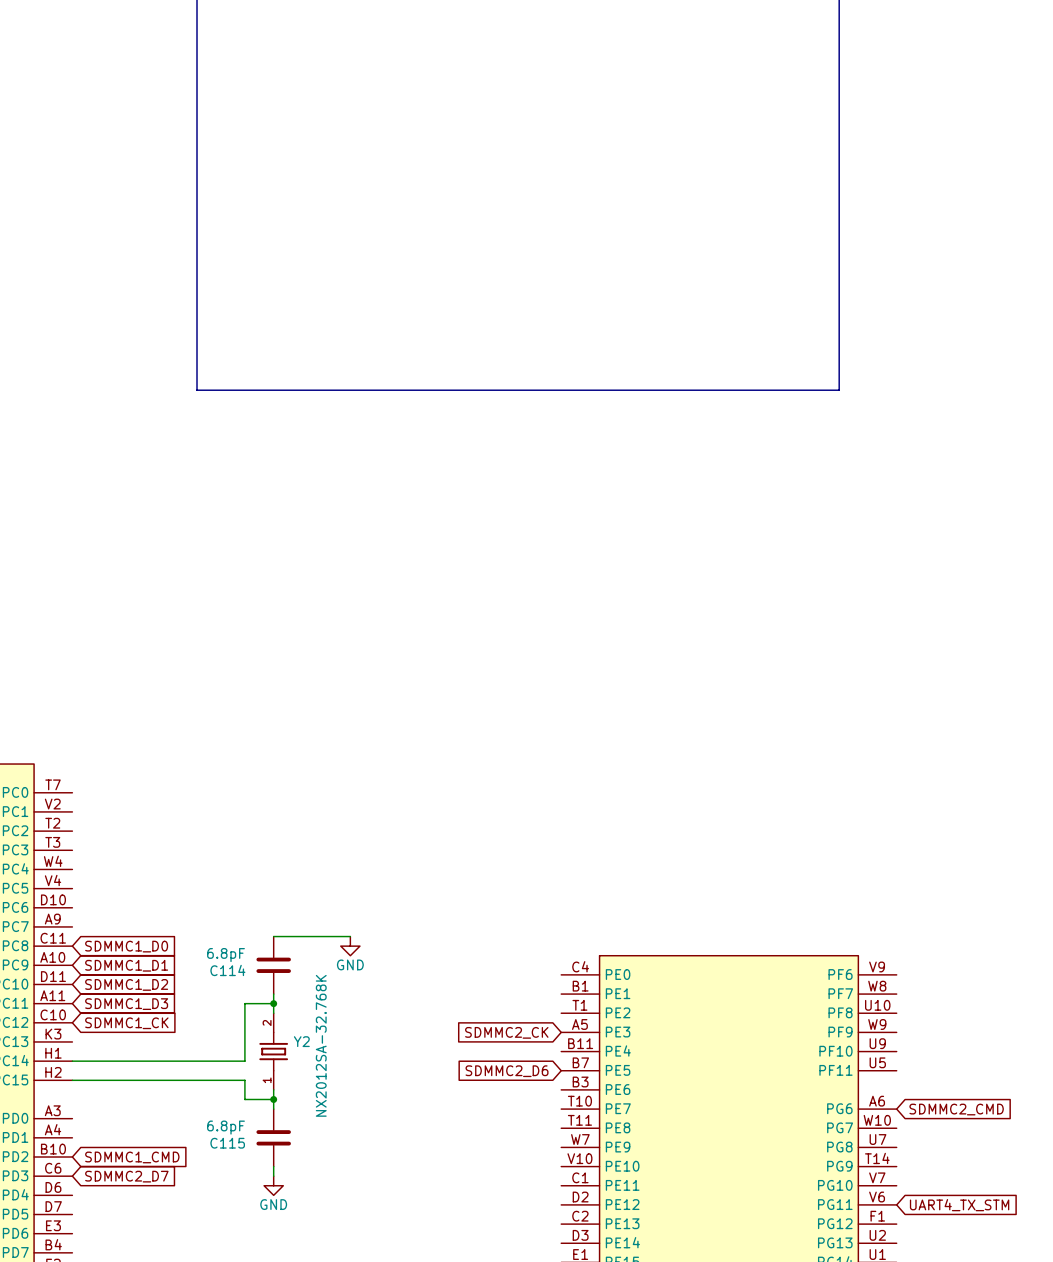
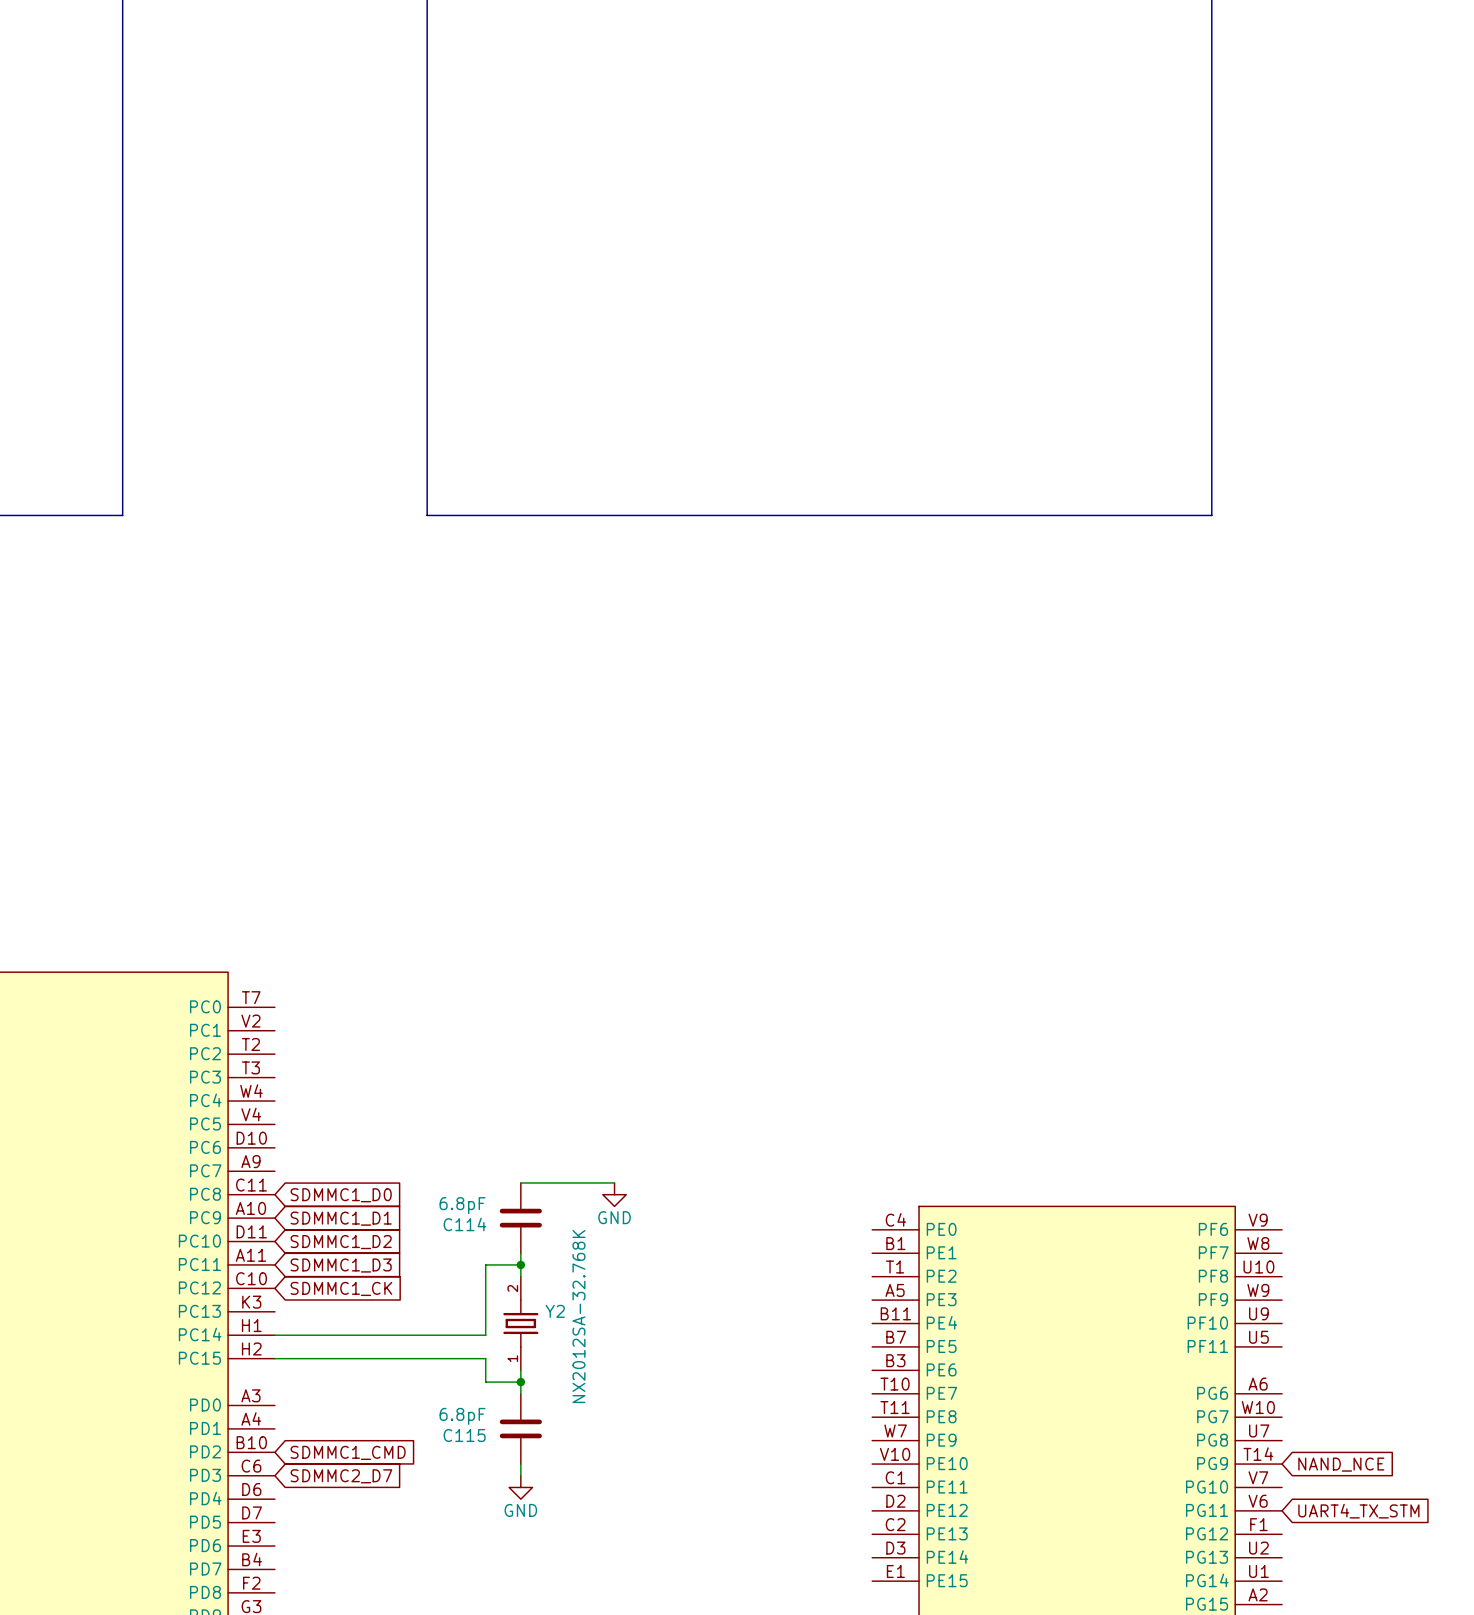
global label: SDMMC2_CK (506, 1032) -> none
global label: SDMMC2_D6 (507, 1071) -> none
global label: SDMMC2_CMD (956, 1109) -> none
global label: none -> NAND_NCE (1341, 1464)

